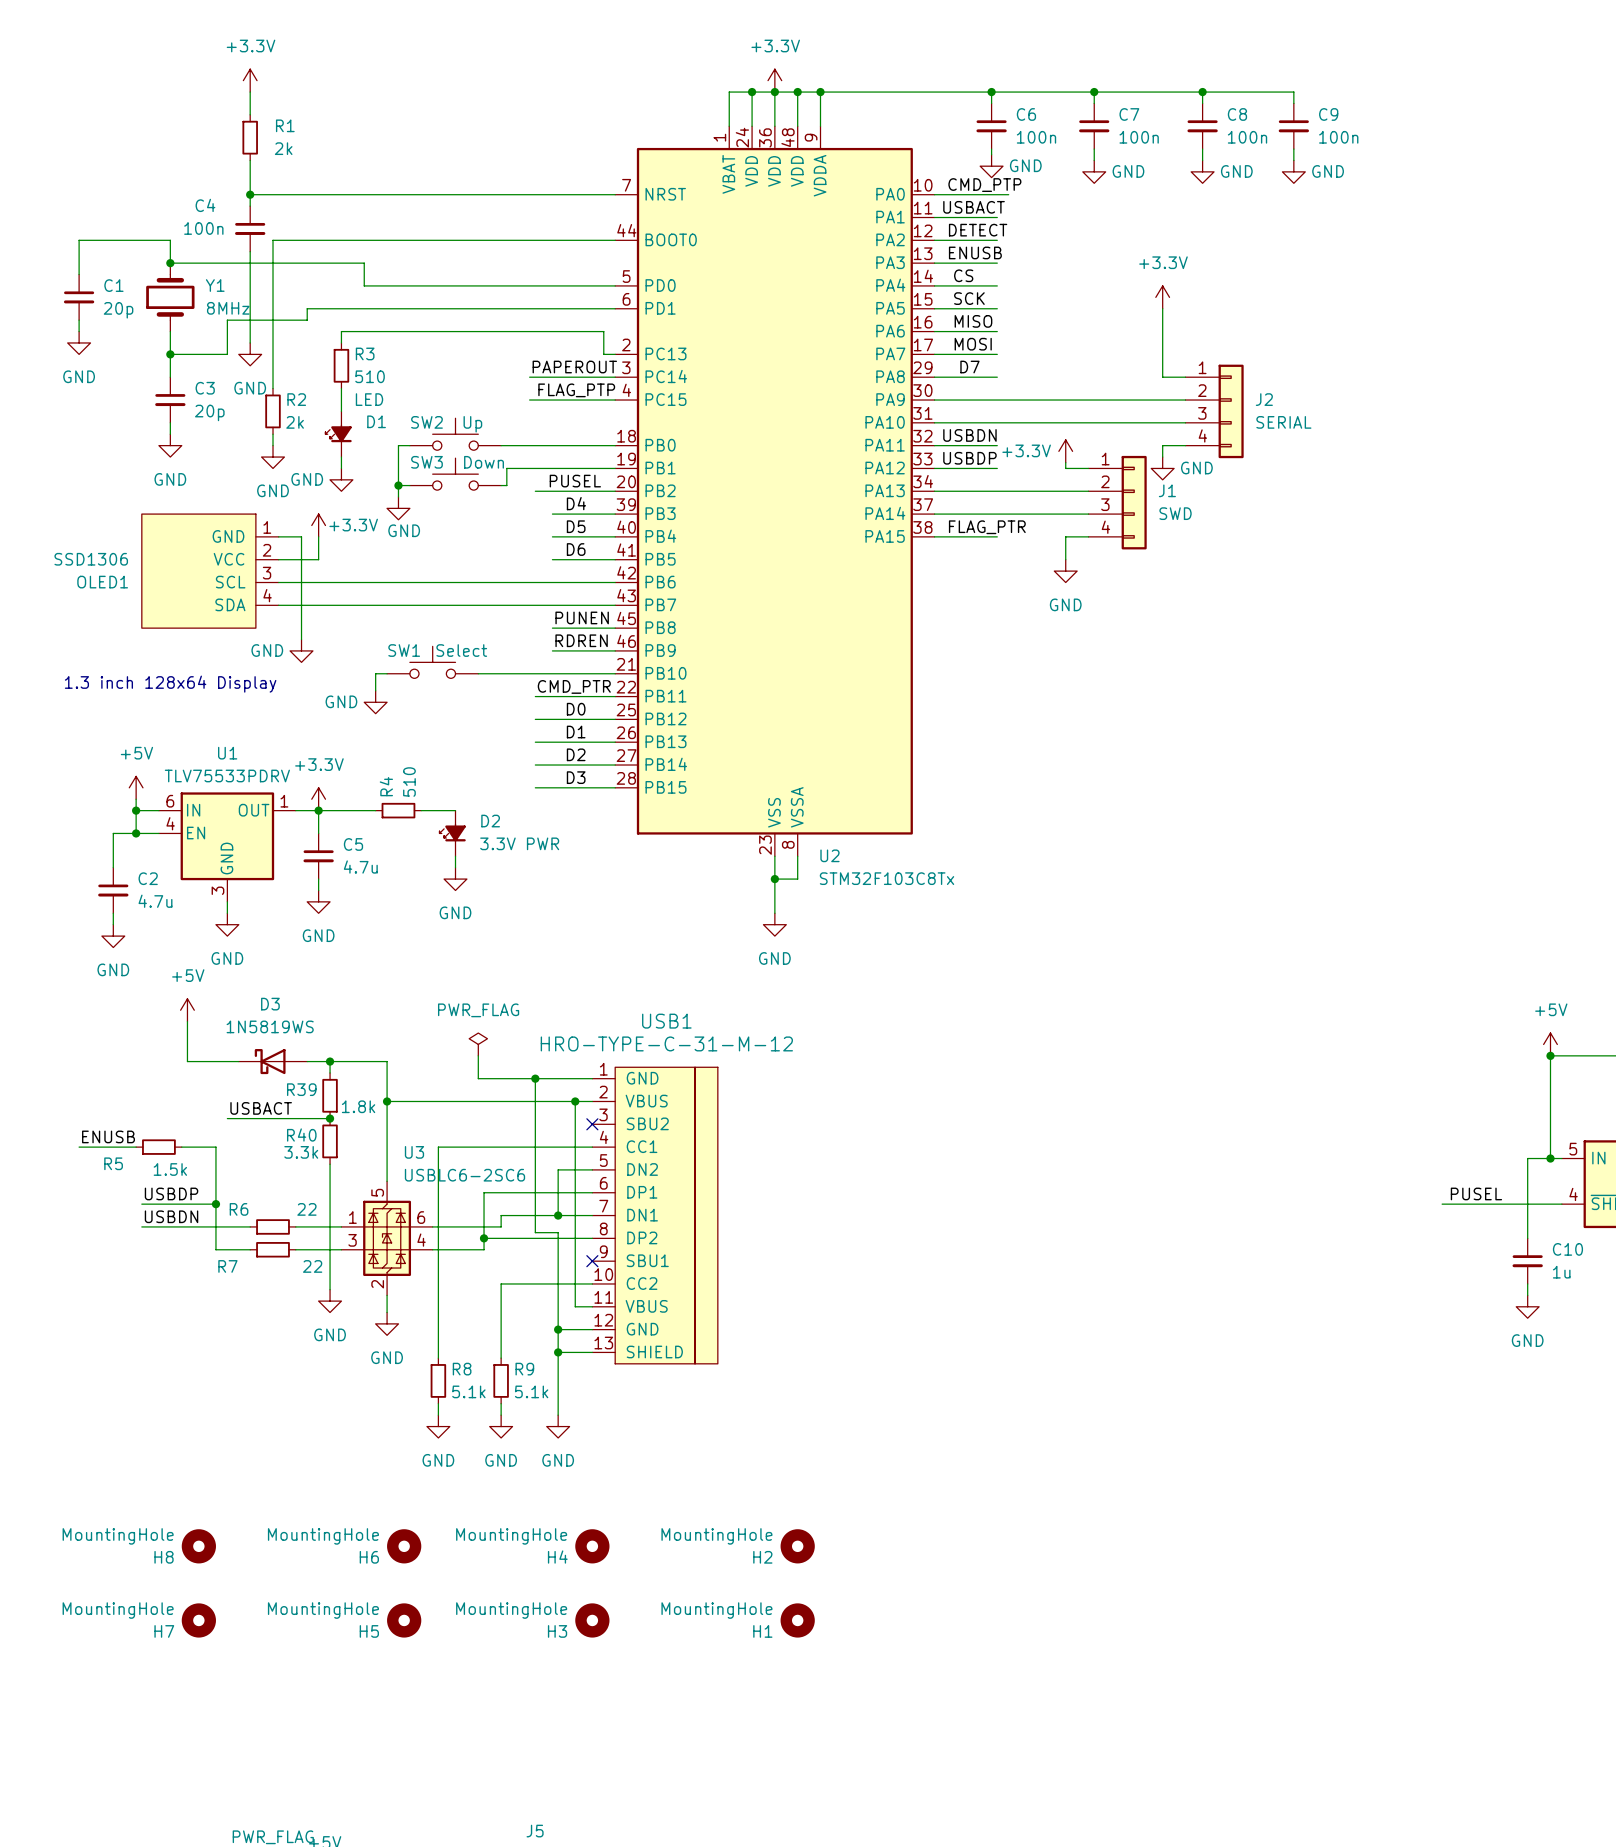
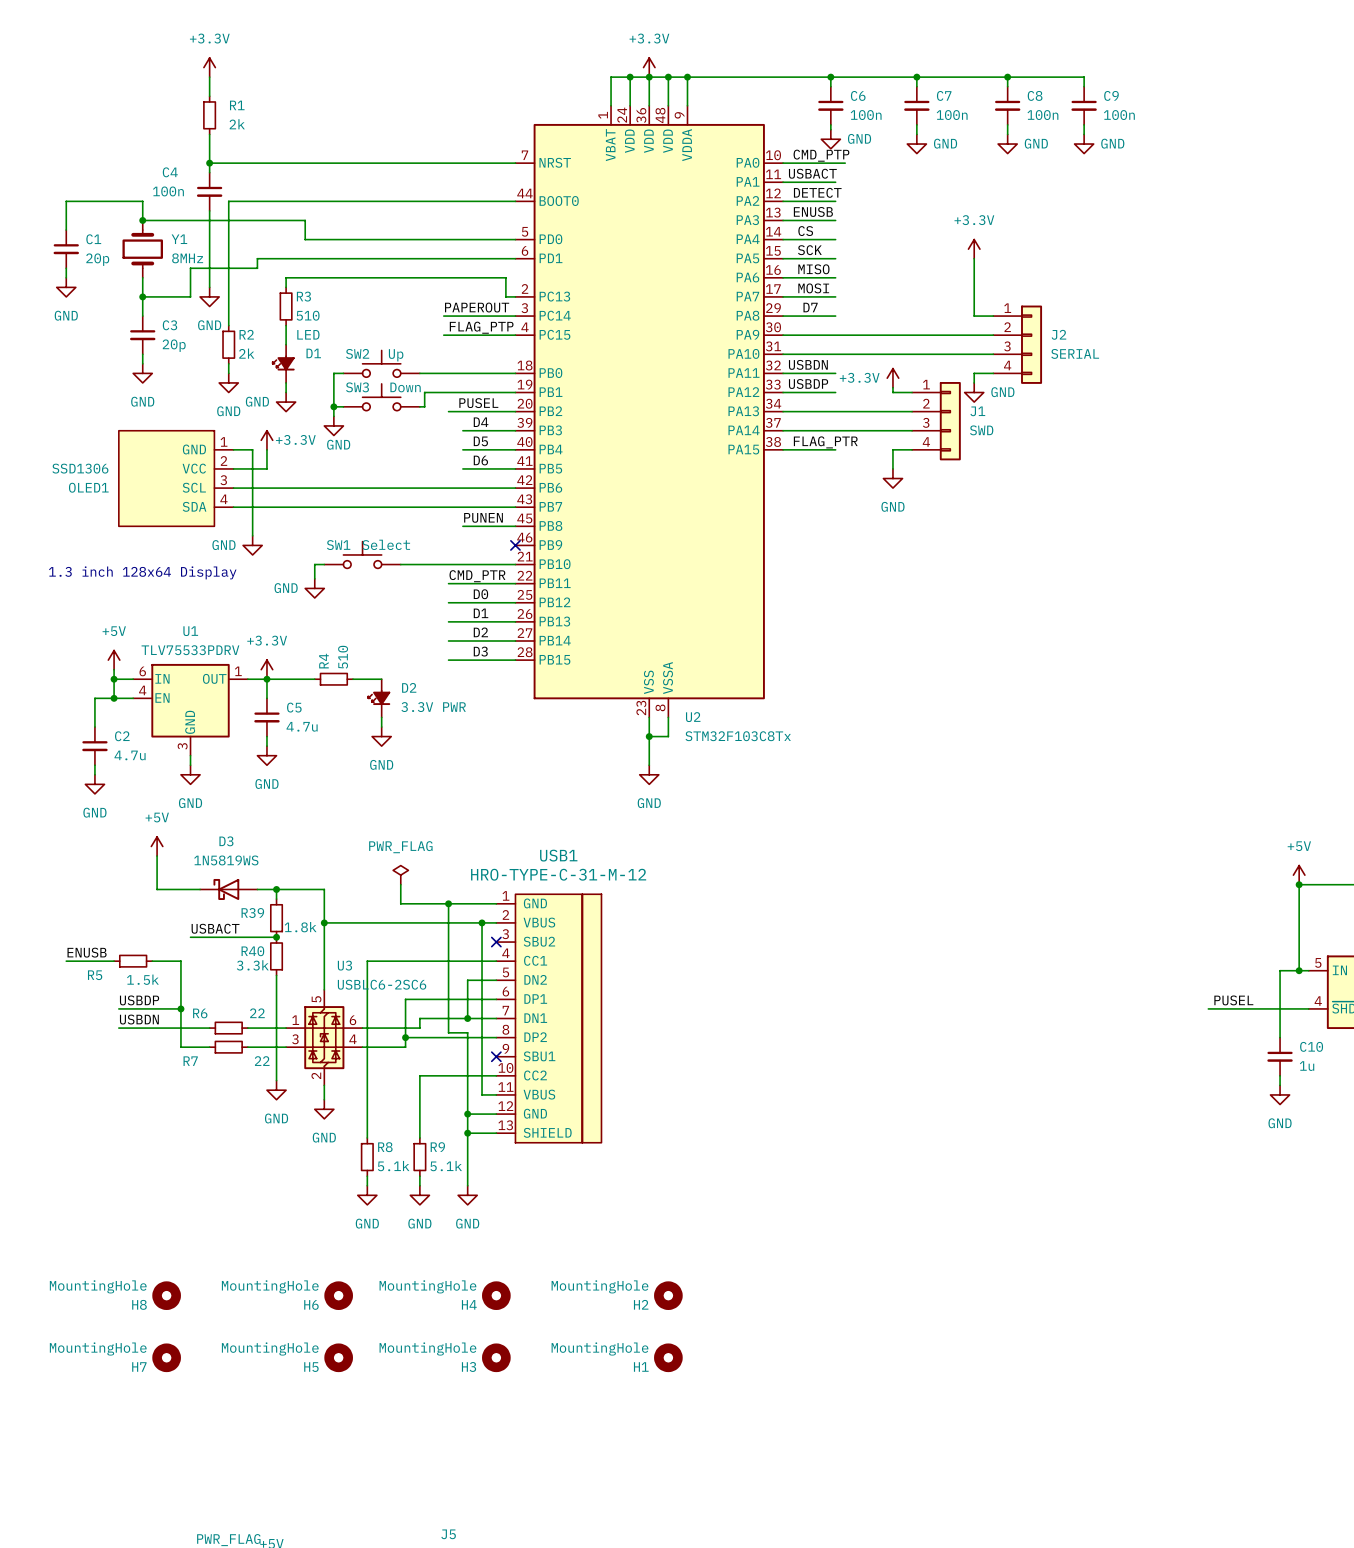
label: RDREN (581, 640) -> none
wire: (552, 650) (615, 650) -> none
no-connect mark: none -> (515, 545)

